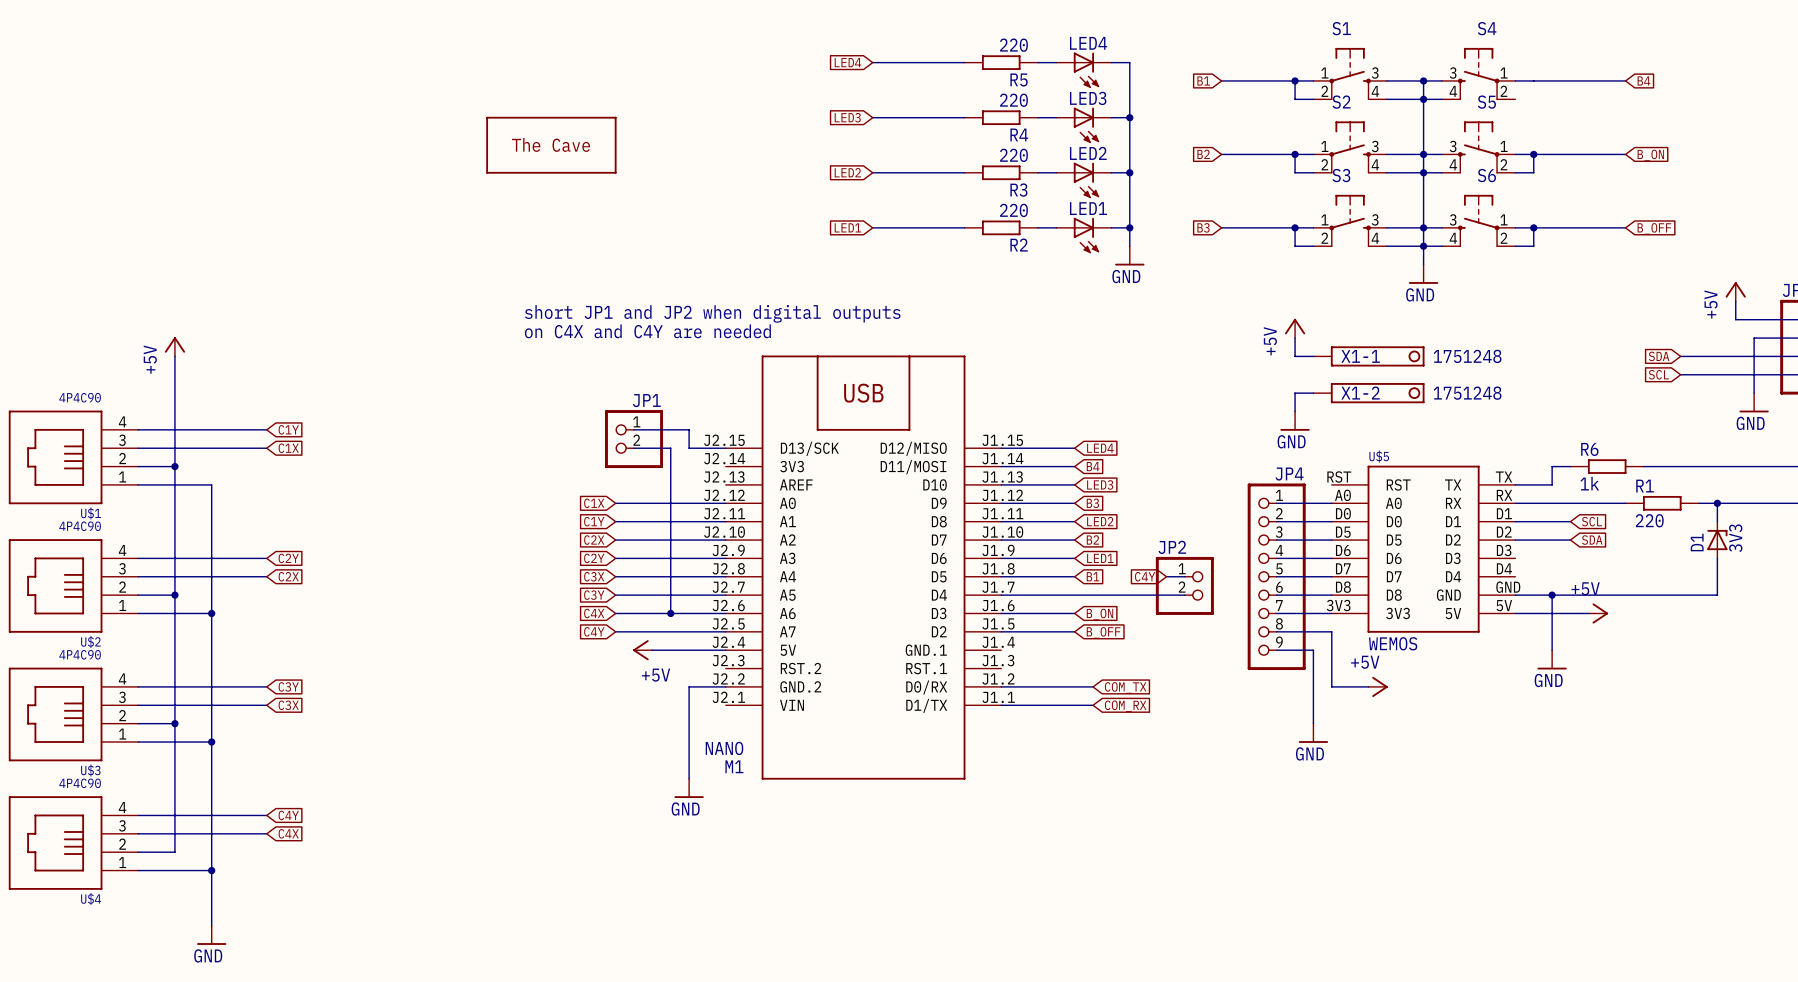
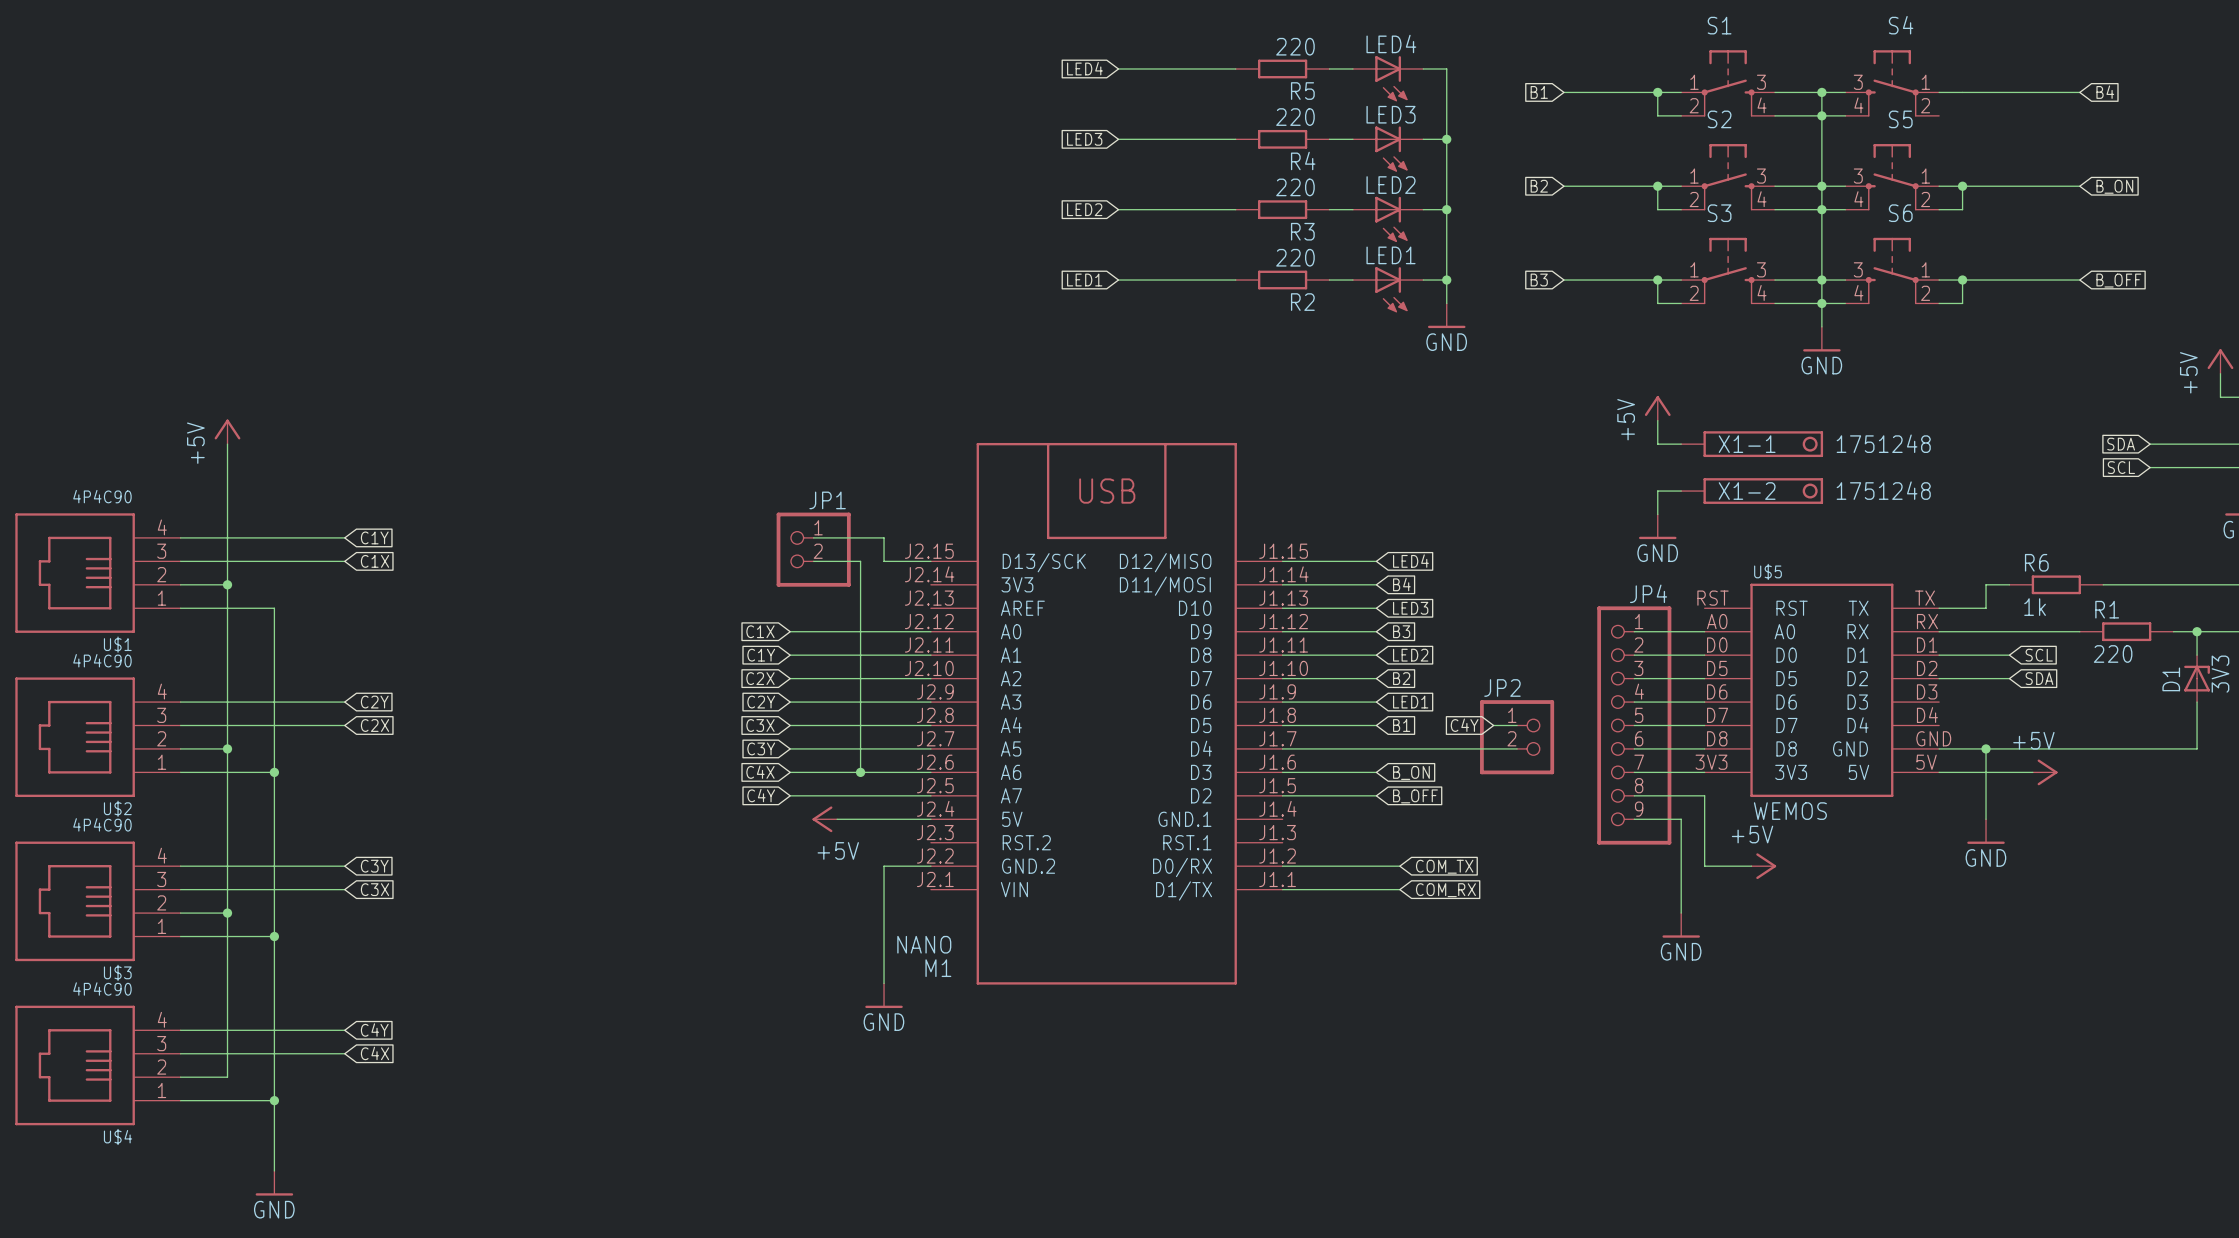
part: (551, 145) -> none
text: short JP1 and JP2 when digital outputs (712, 313) -> none
text: on C4X and C4Y are needed (647, 331) -> none

